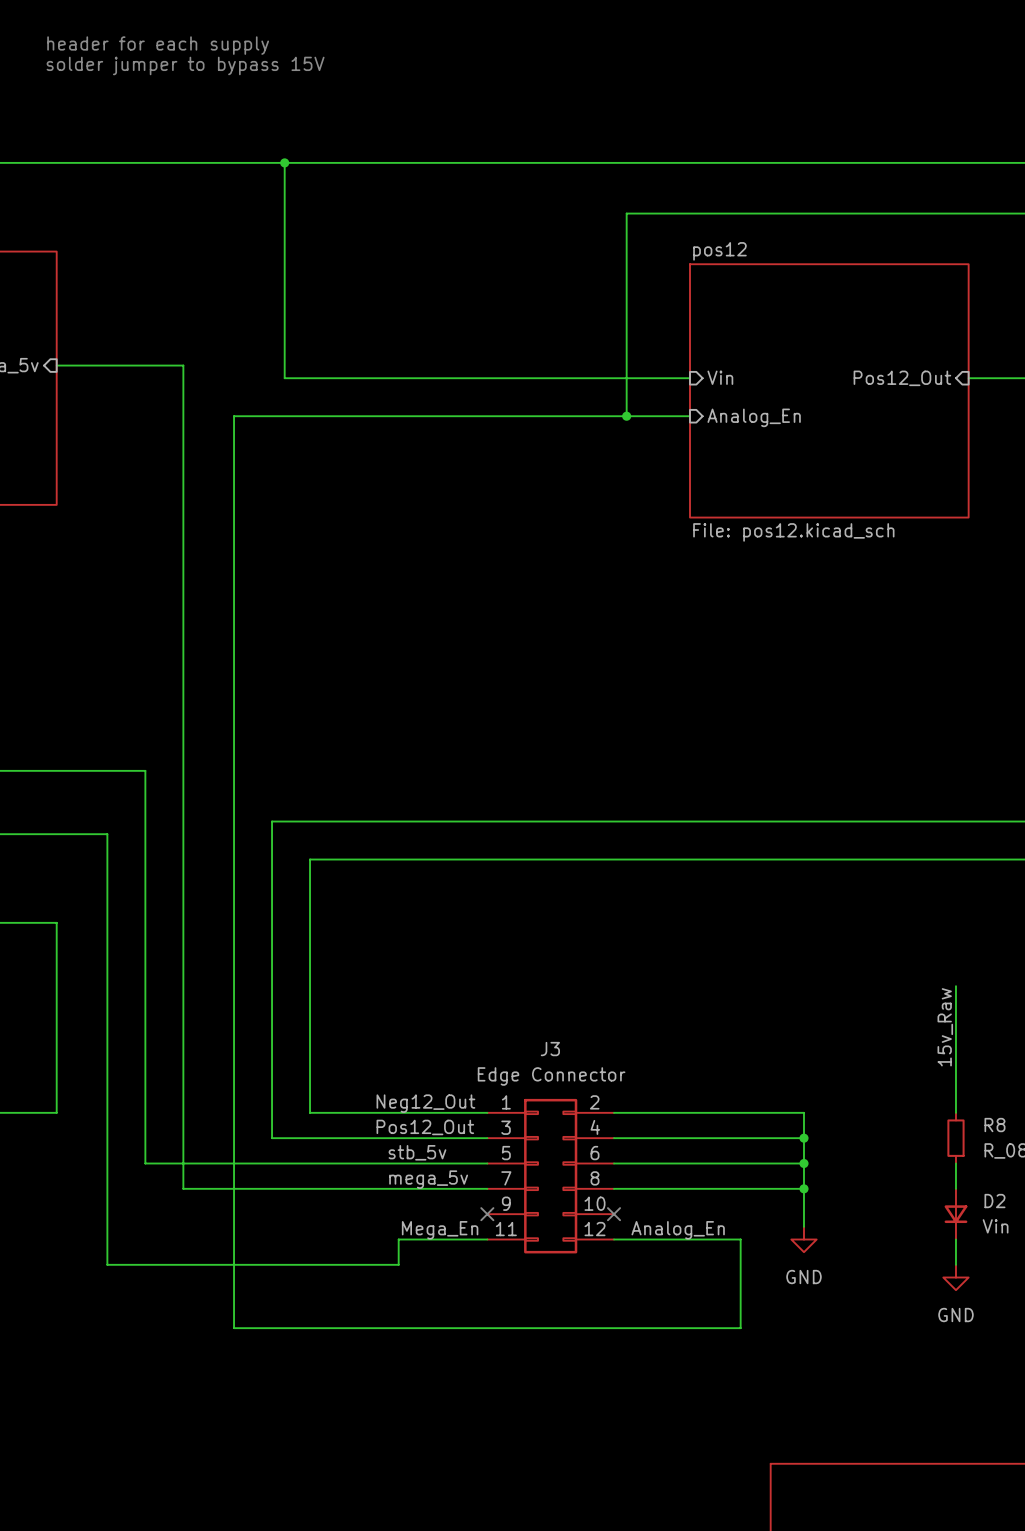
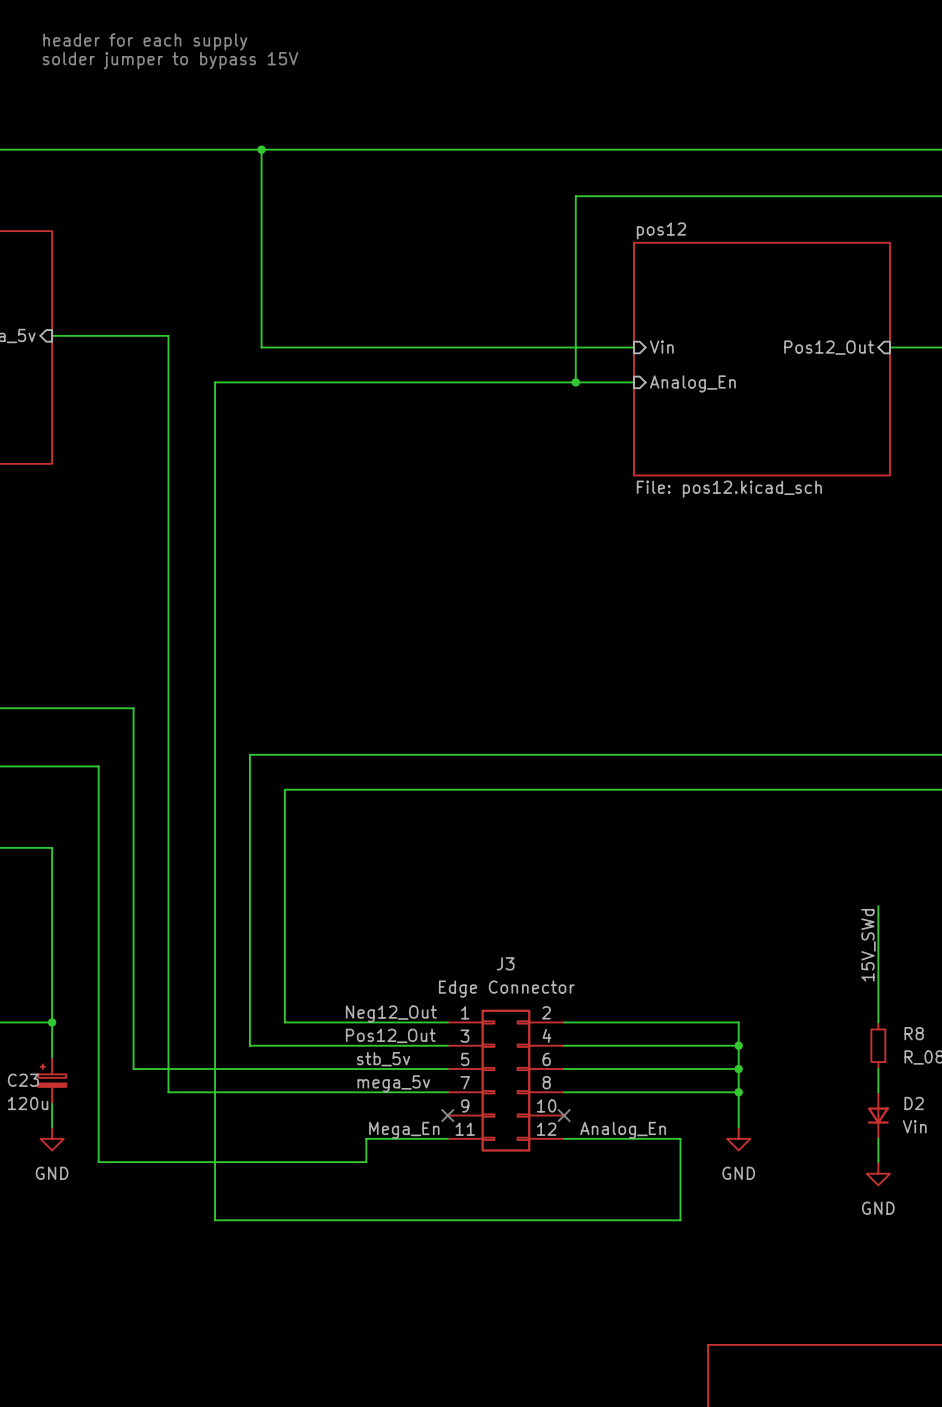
label: 15v_Raw (945, 1027) -> 15V_SWd (868, 945)
wire: none -> (52, 1022) (52, 1057)
junction: none -> (52, 1022)
C23: none -> 120u (52, 1080)
wire: none -> (52, 1103) (52, 1127)
power symbol: none -> GND (52, 1138)

